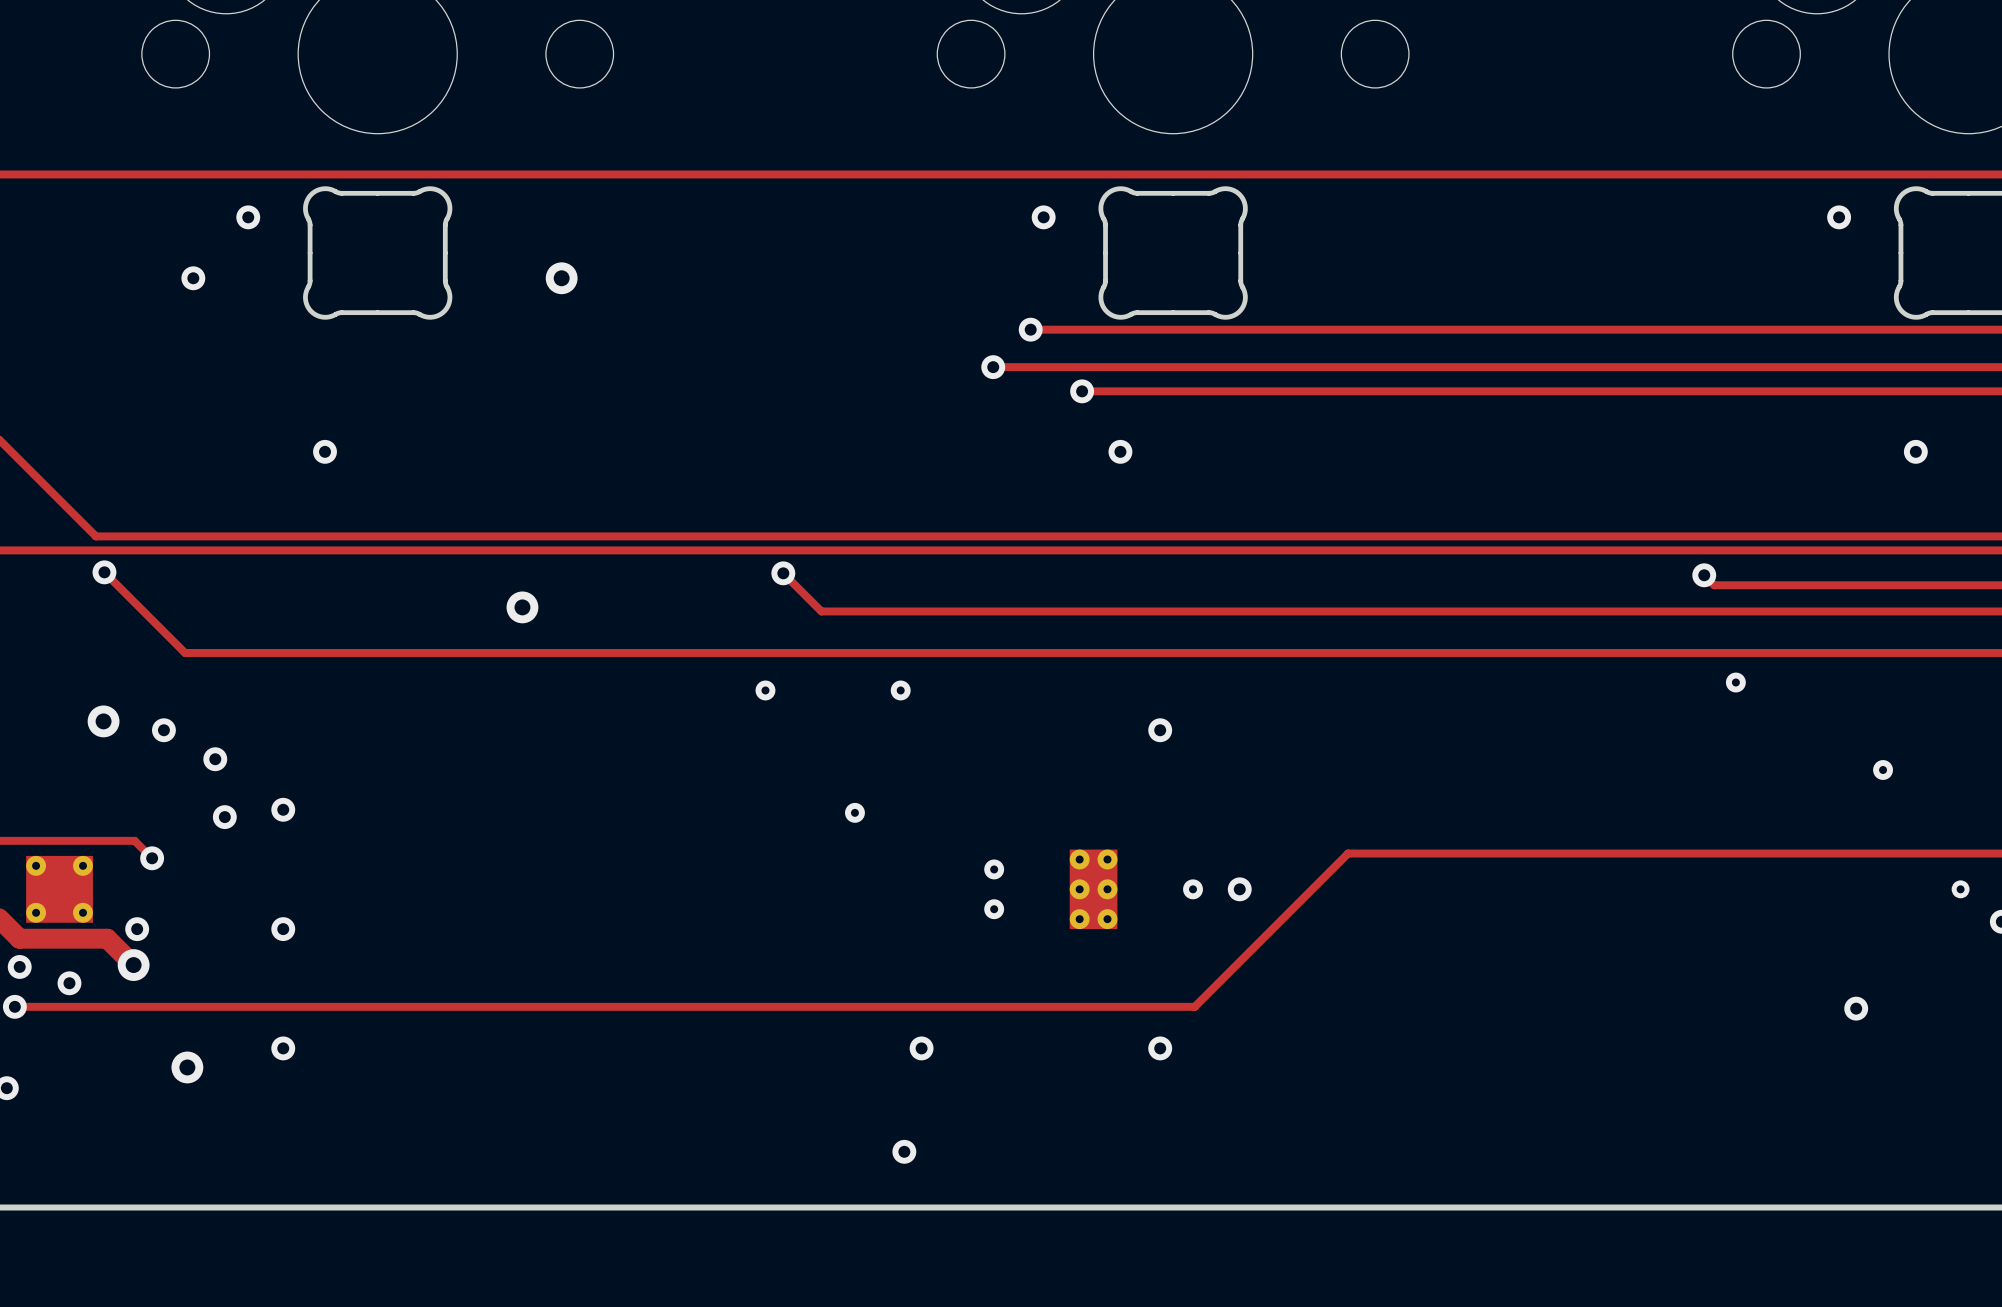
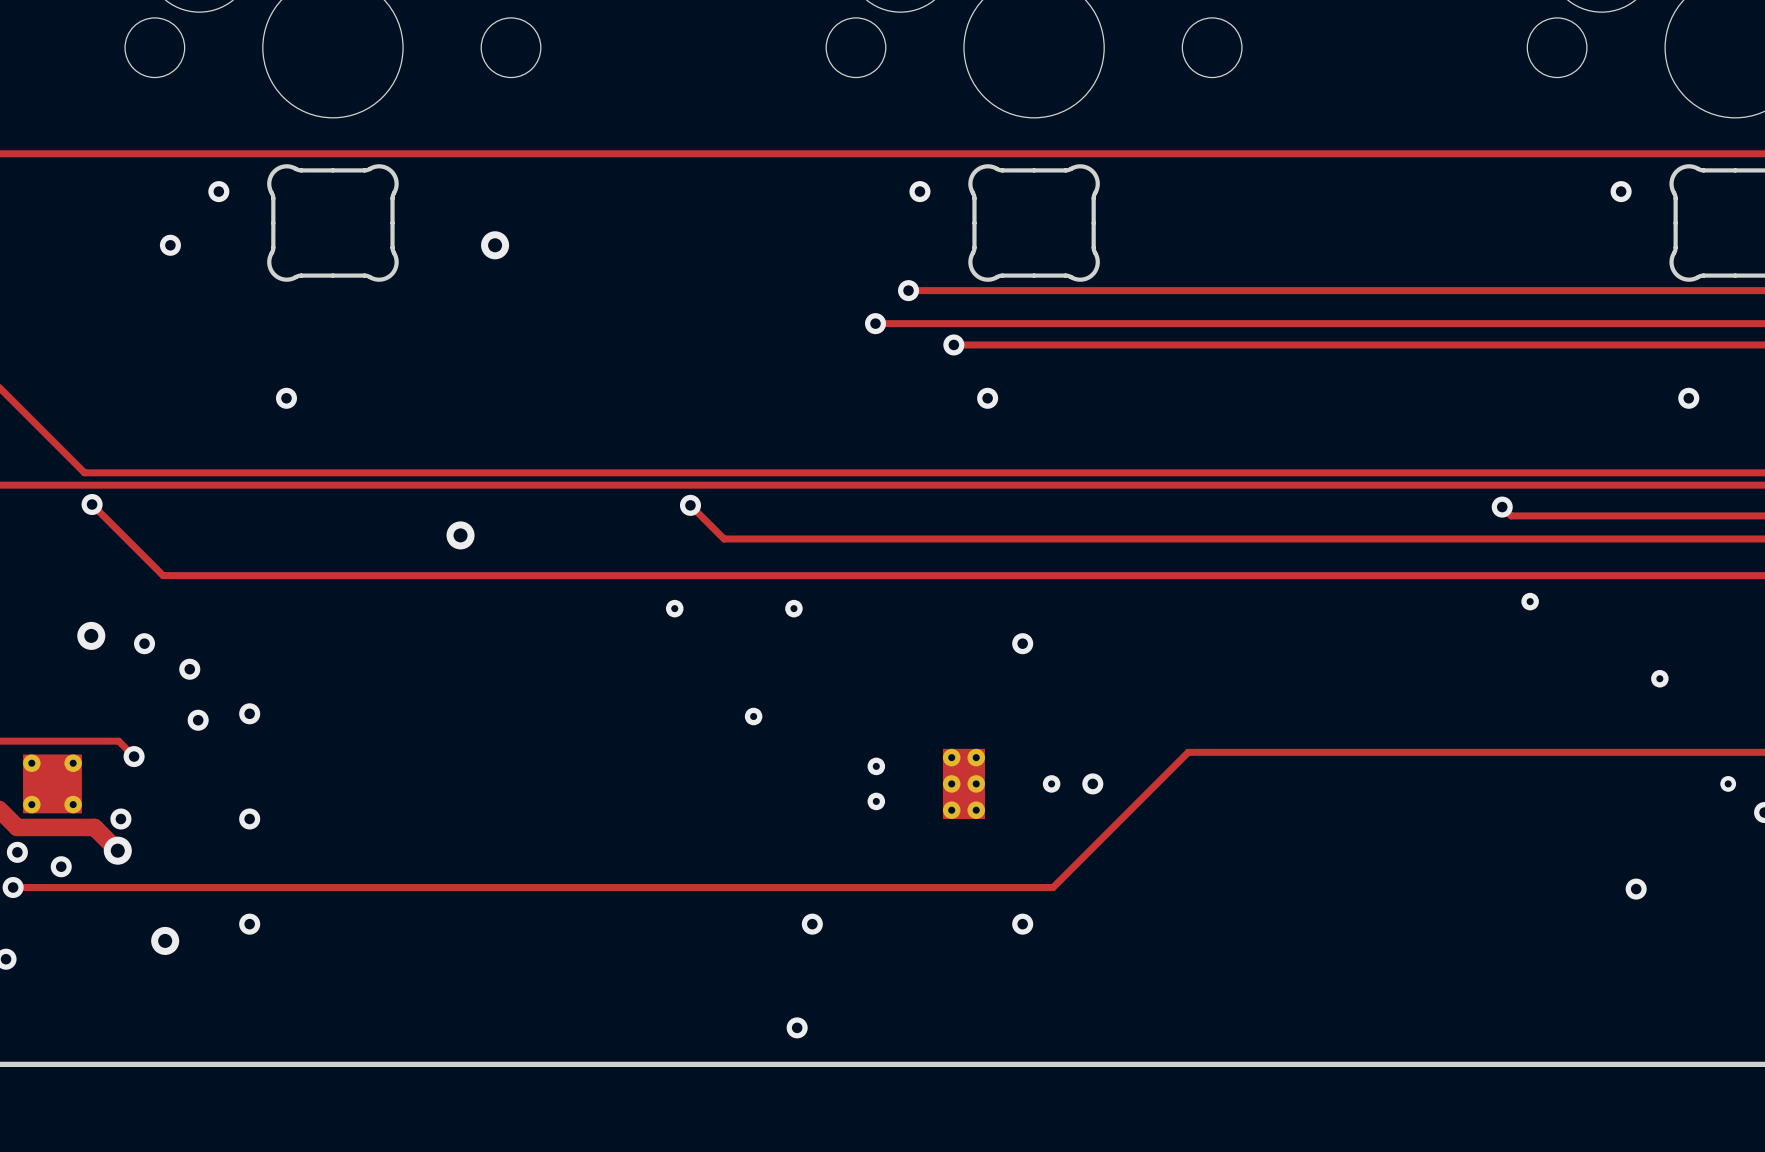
via position: (904, 1151) -> (797, 1027)

